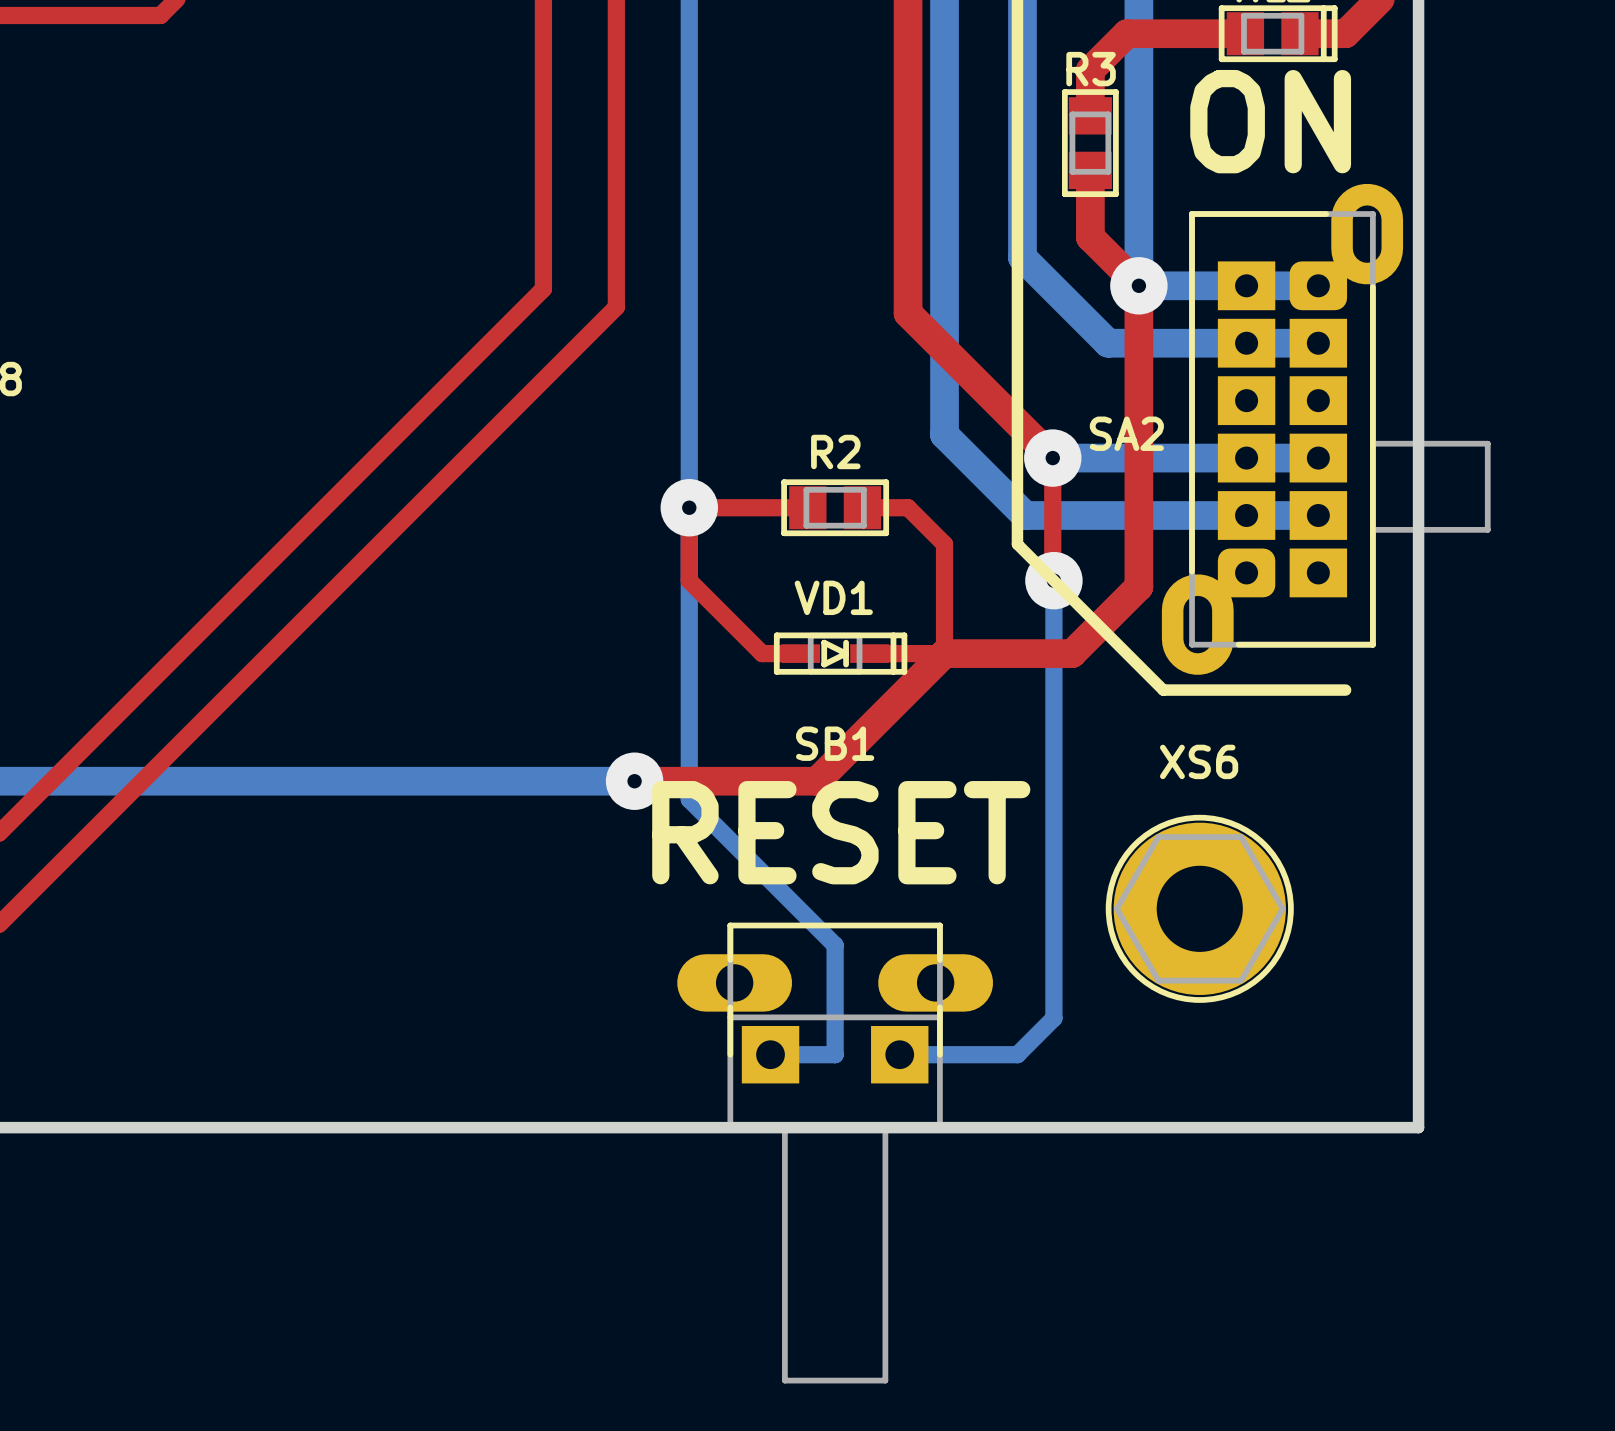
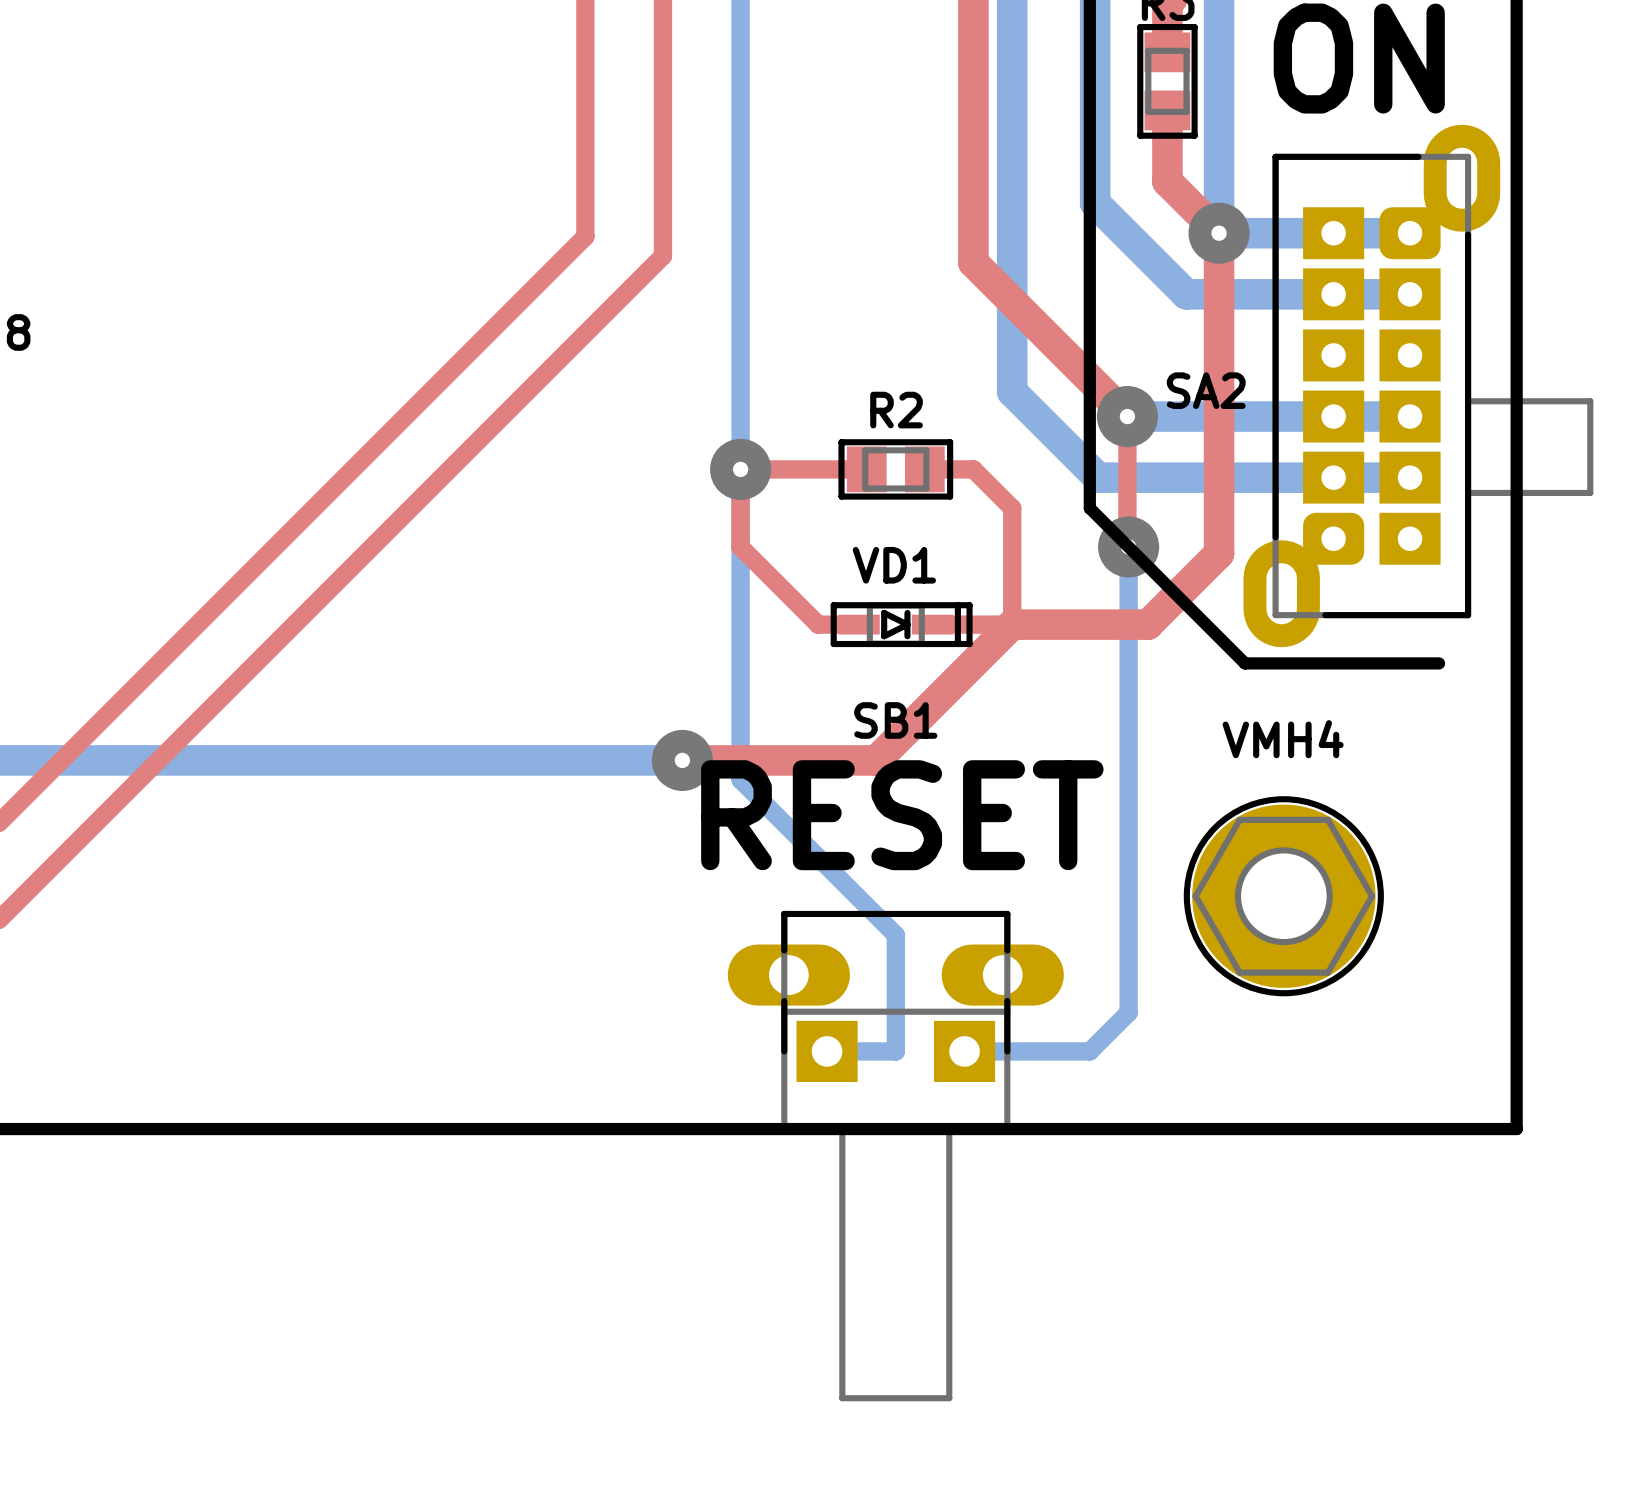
XS6: (1199, 908) -> none
VMH4: none -> (1283, 896)

